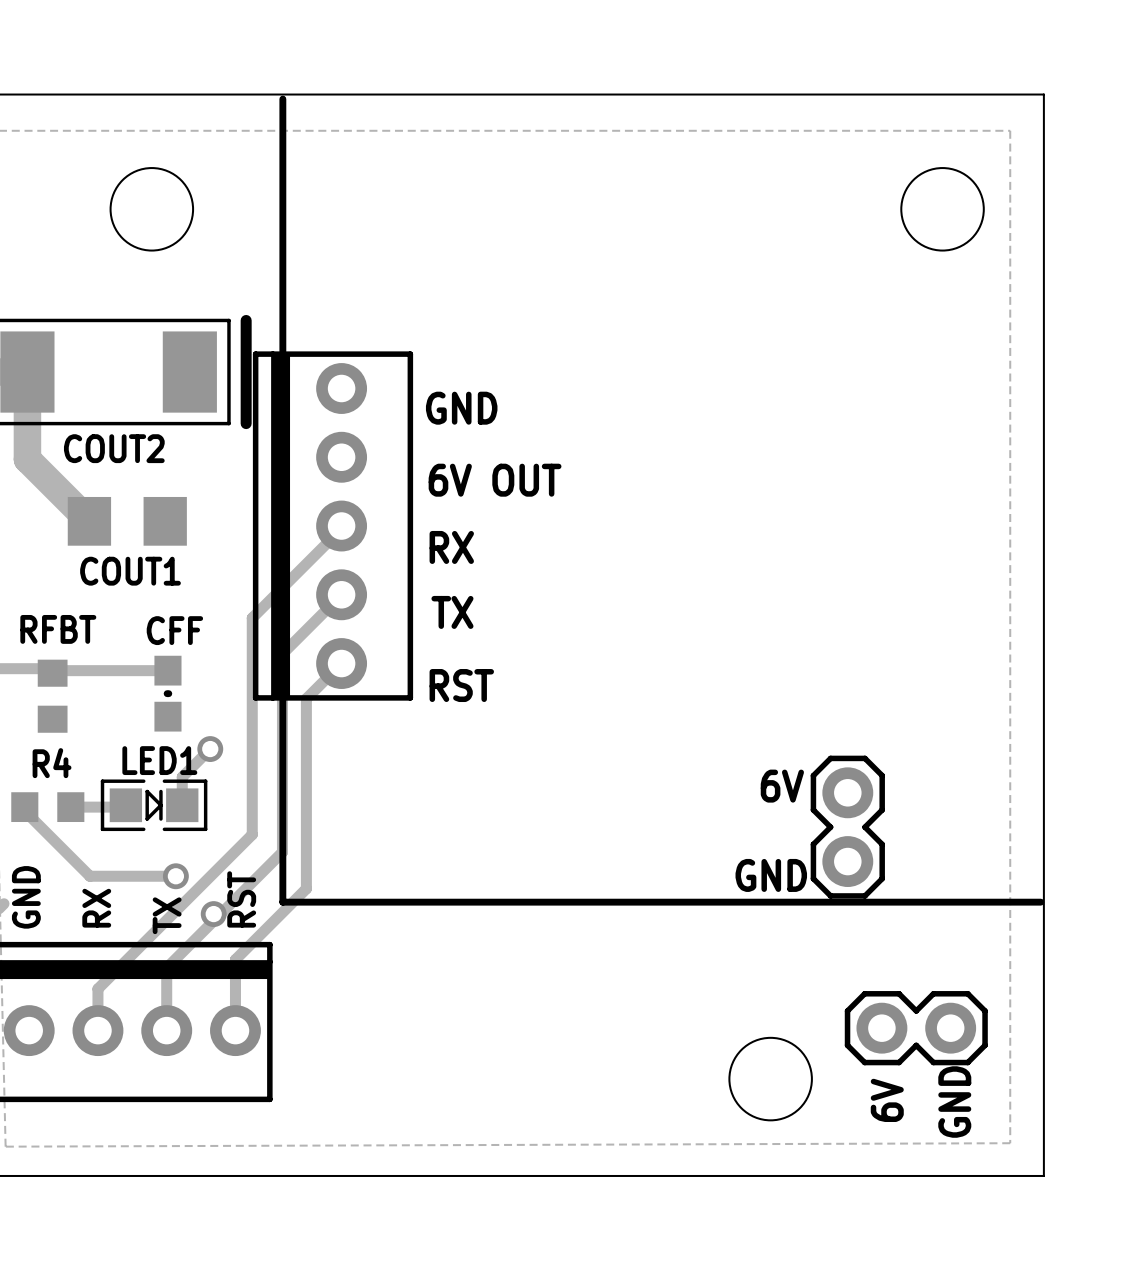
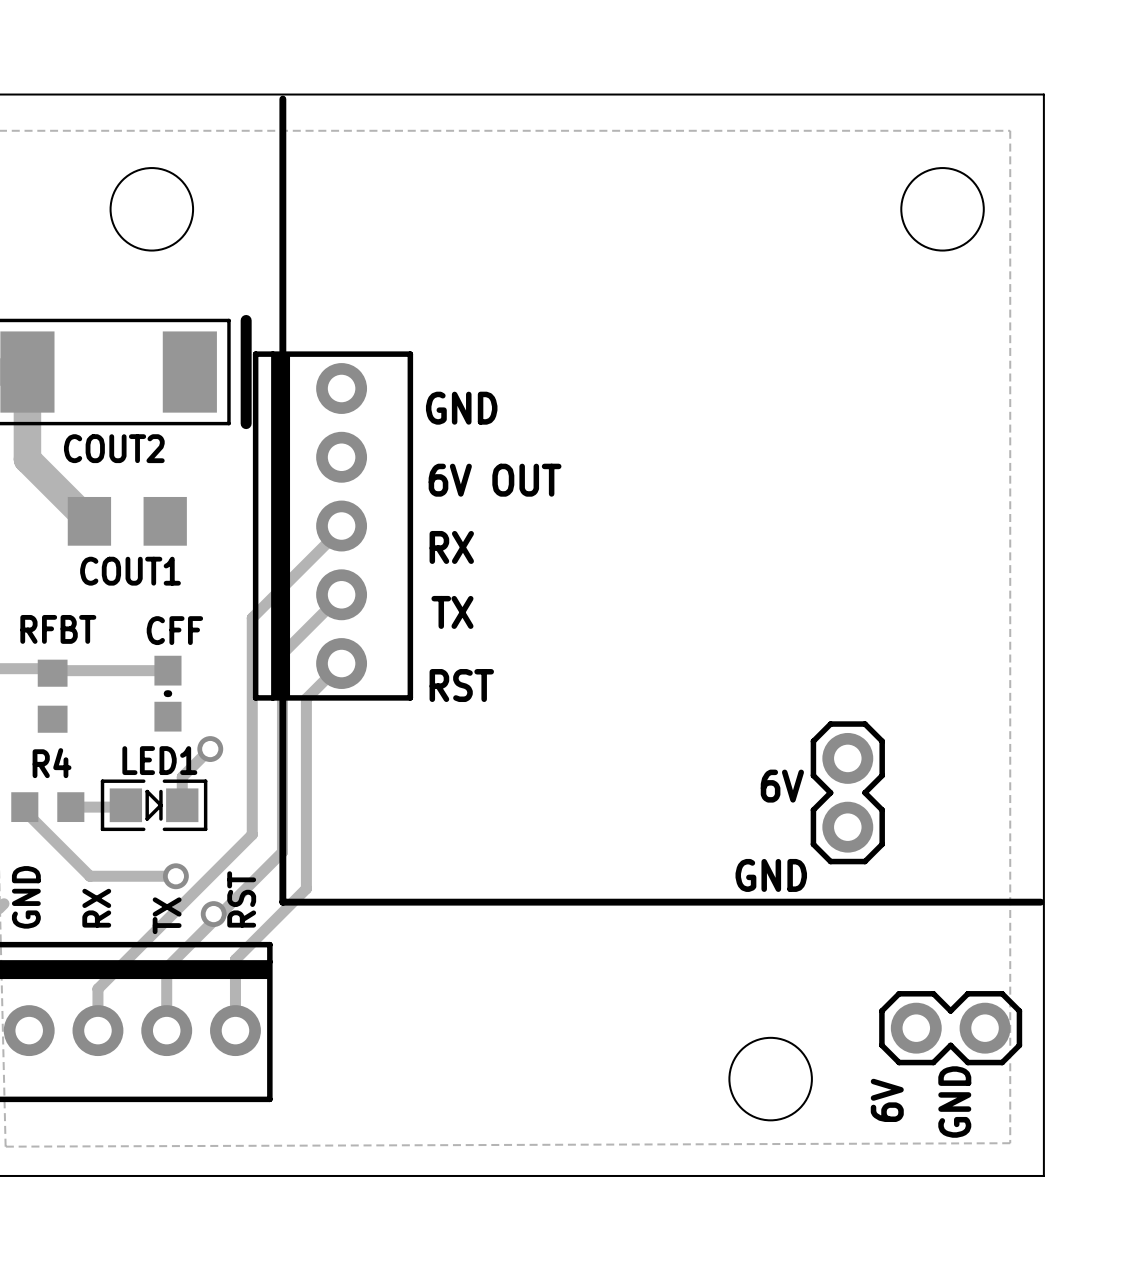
part position: (847, 827) -> (847, 792)
part position: (916, 1028) -> (950, 1028)

